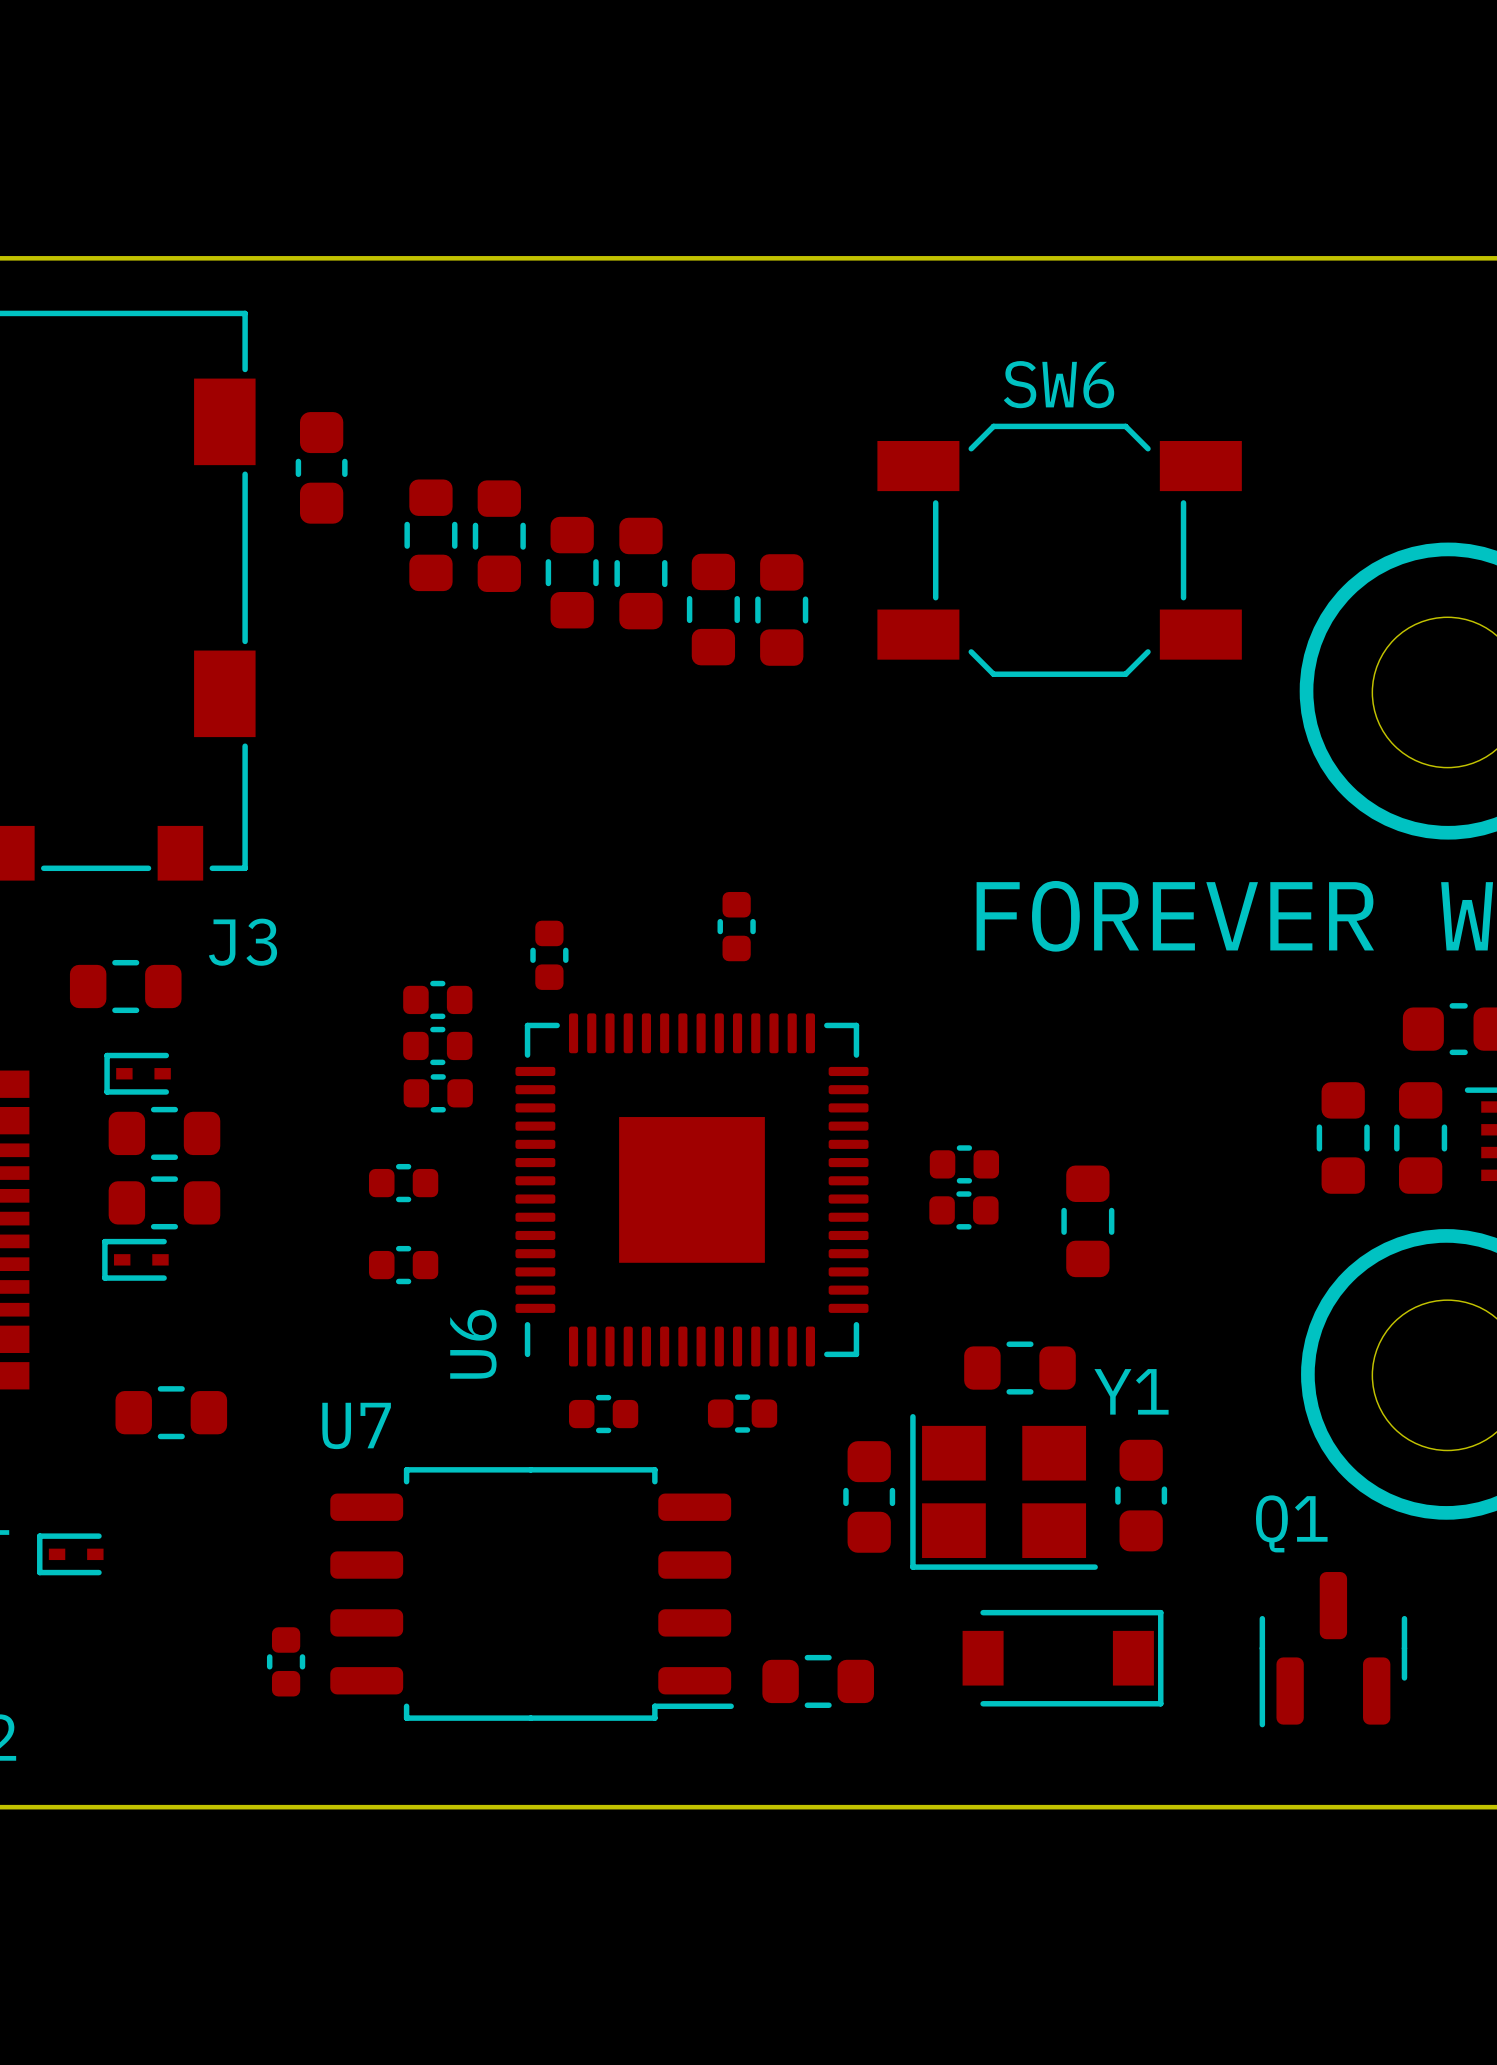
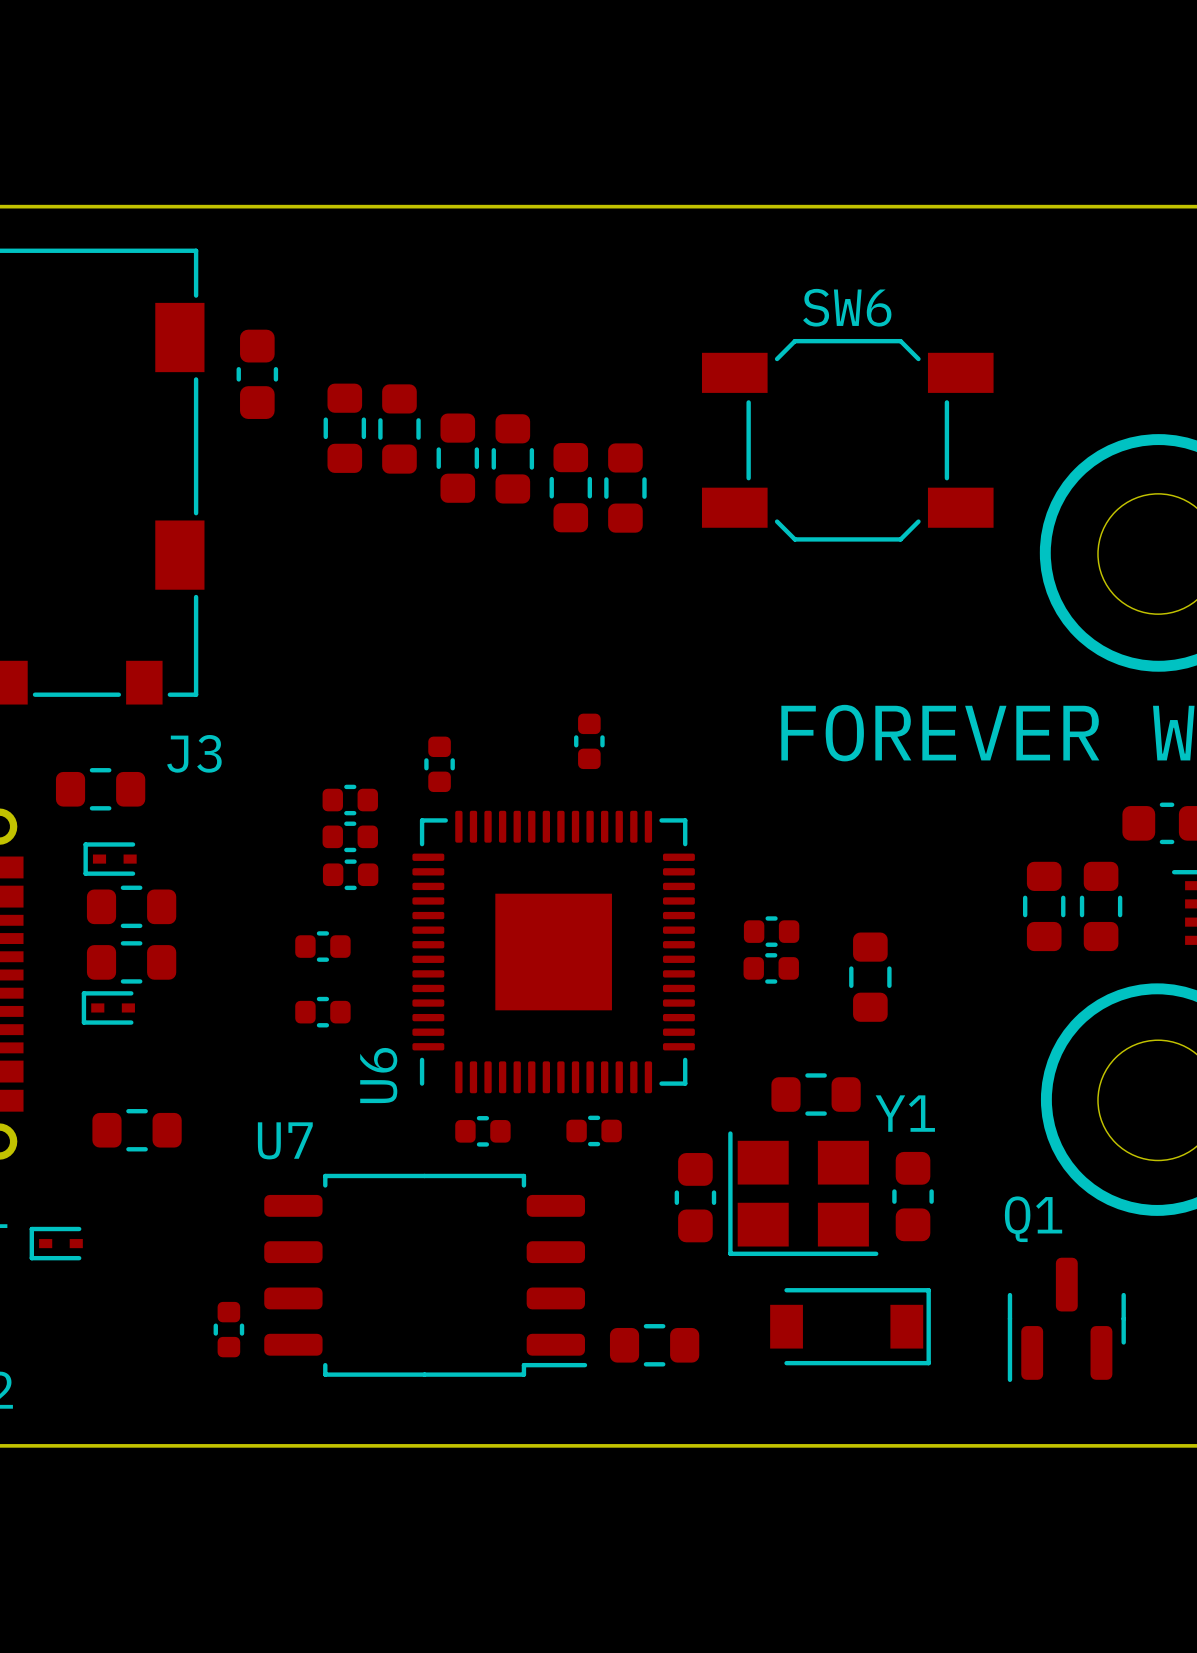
part: none -> (1044, 906)
part: none -> (1101, 906)
part: (1343, 1137) -> none
part: (1420, 1137) -> none

